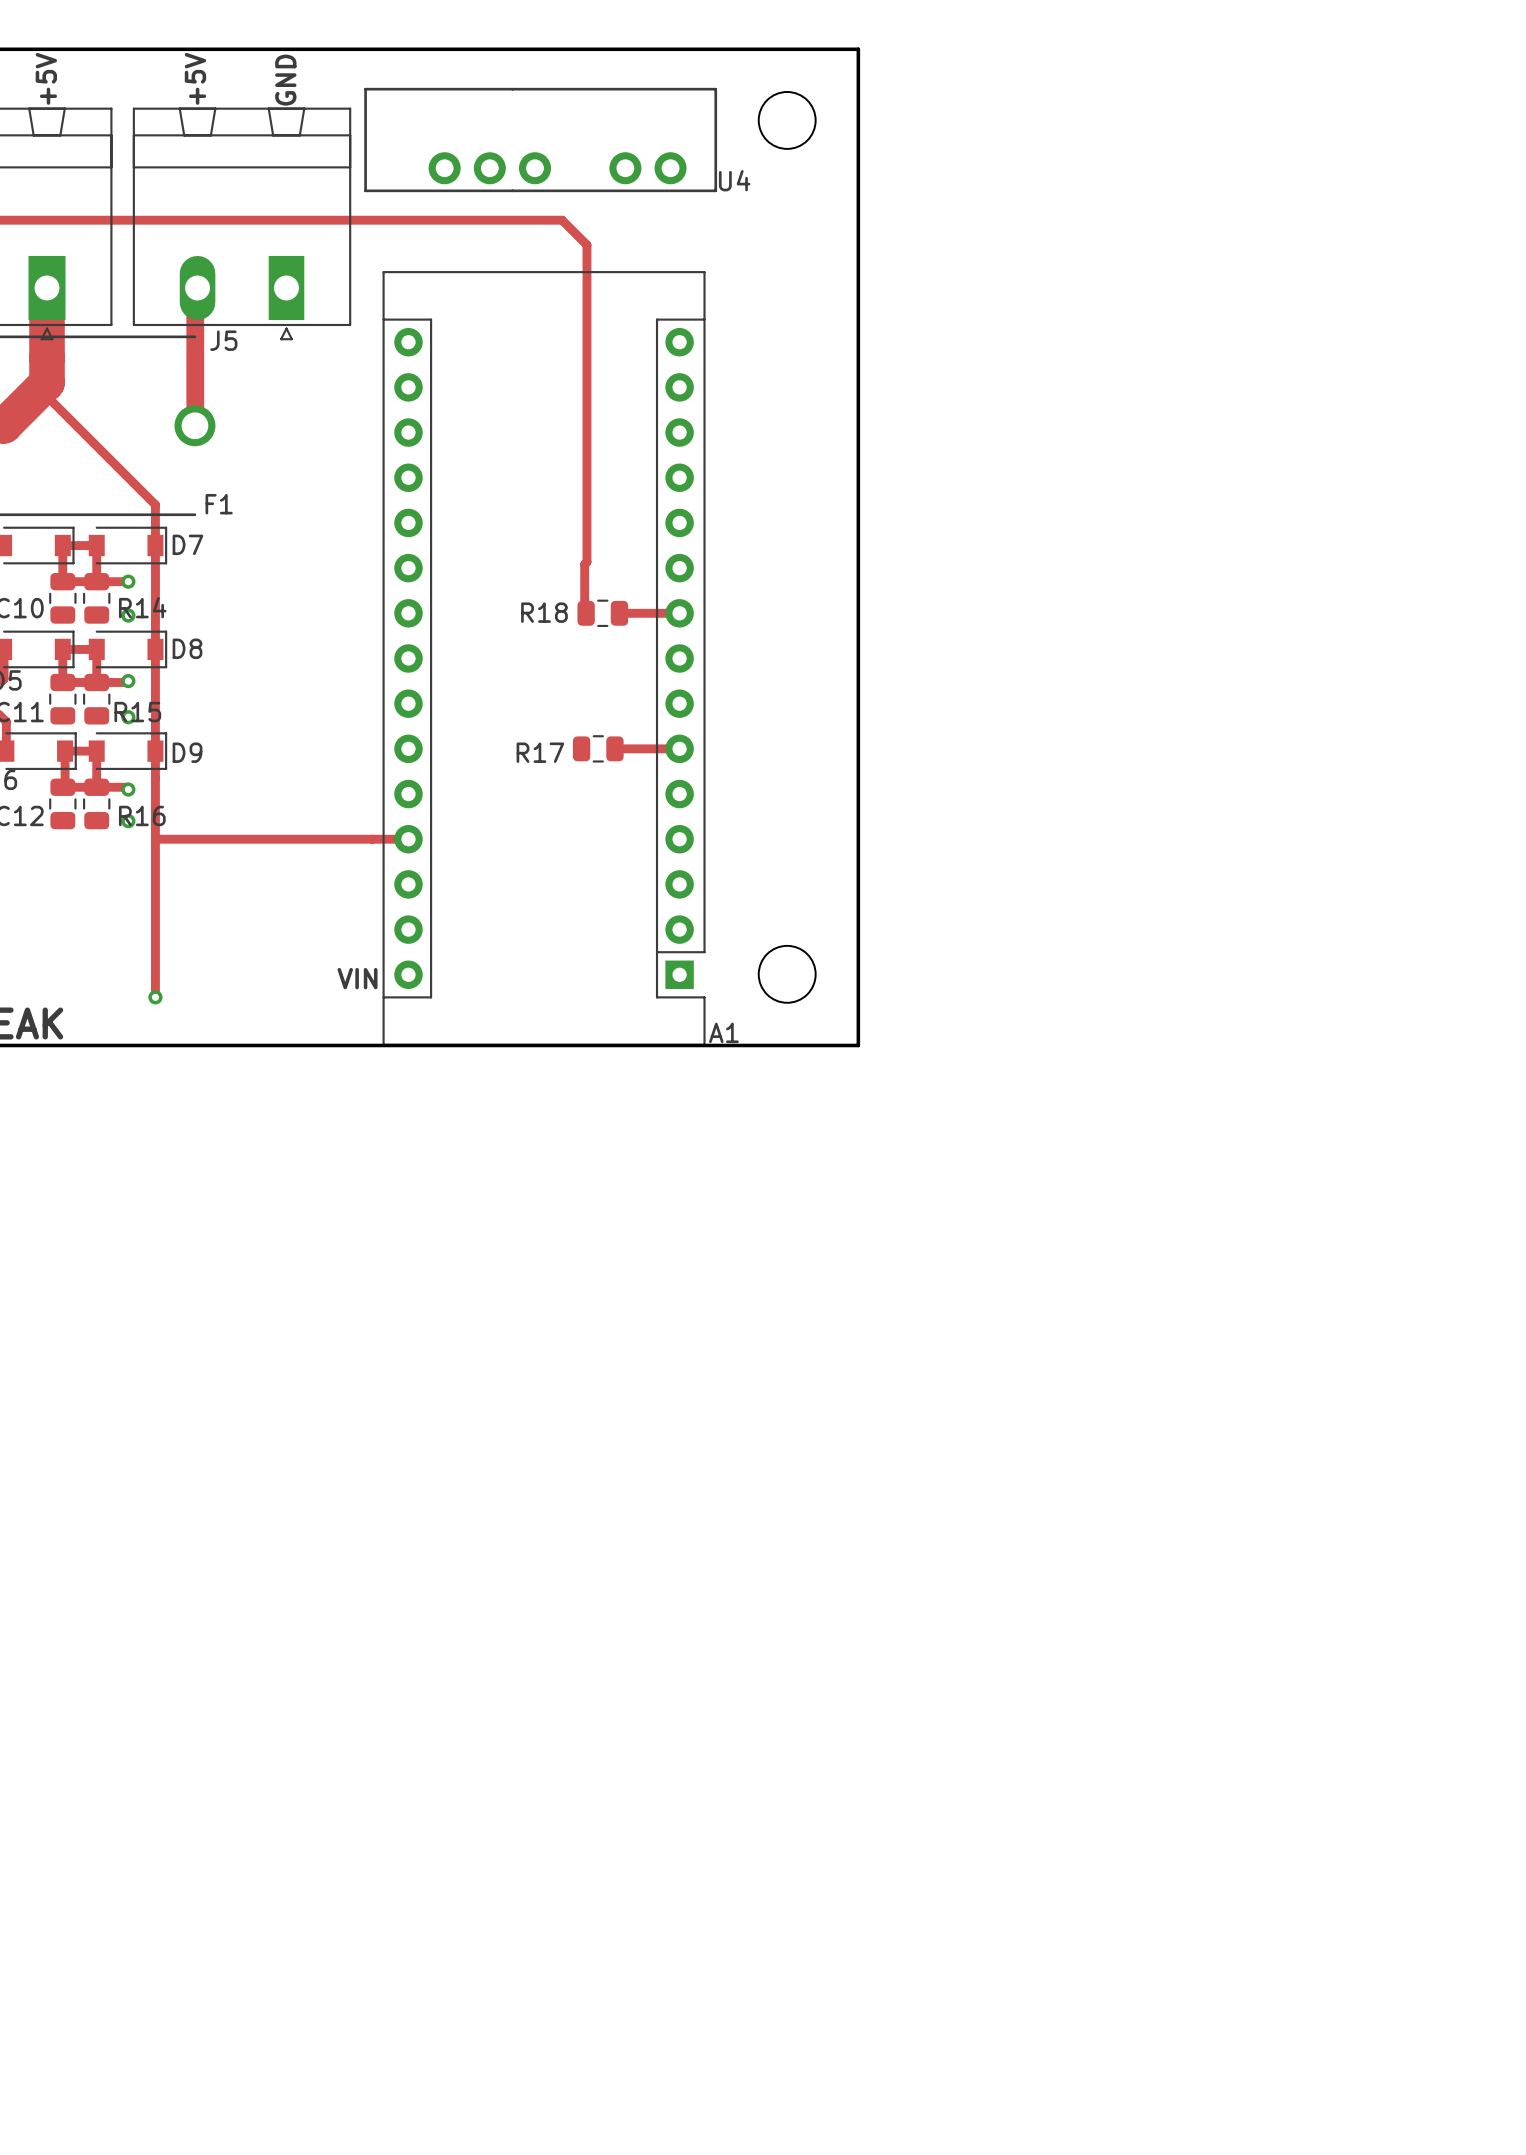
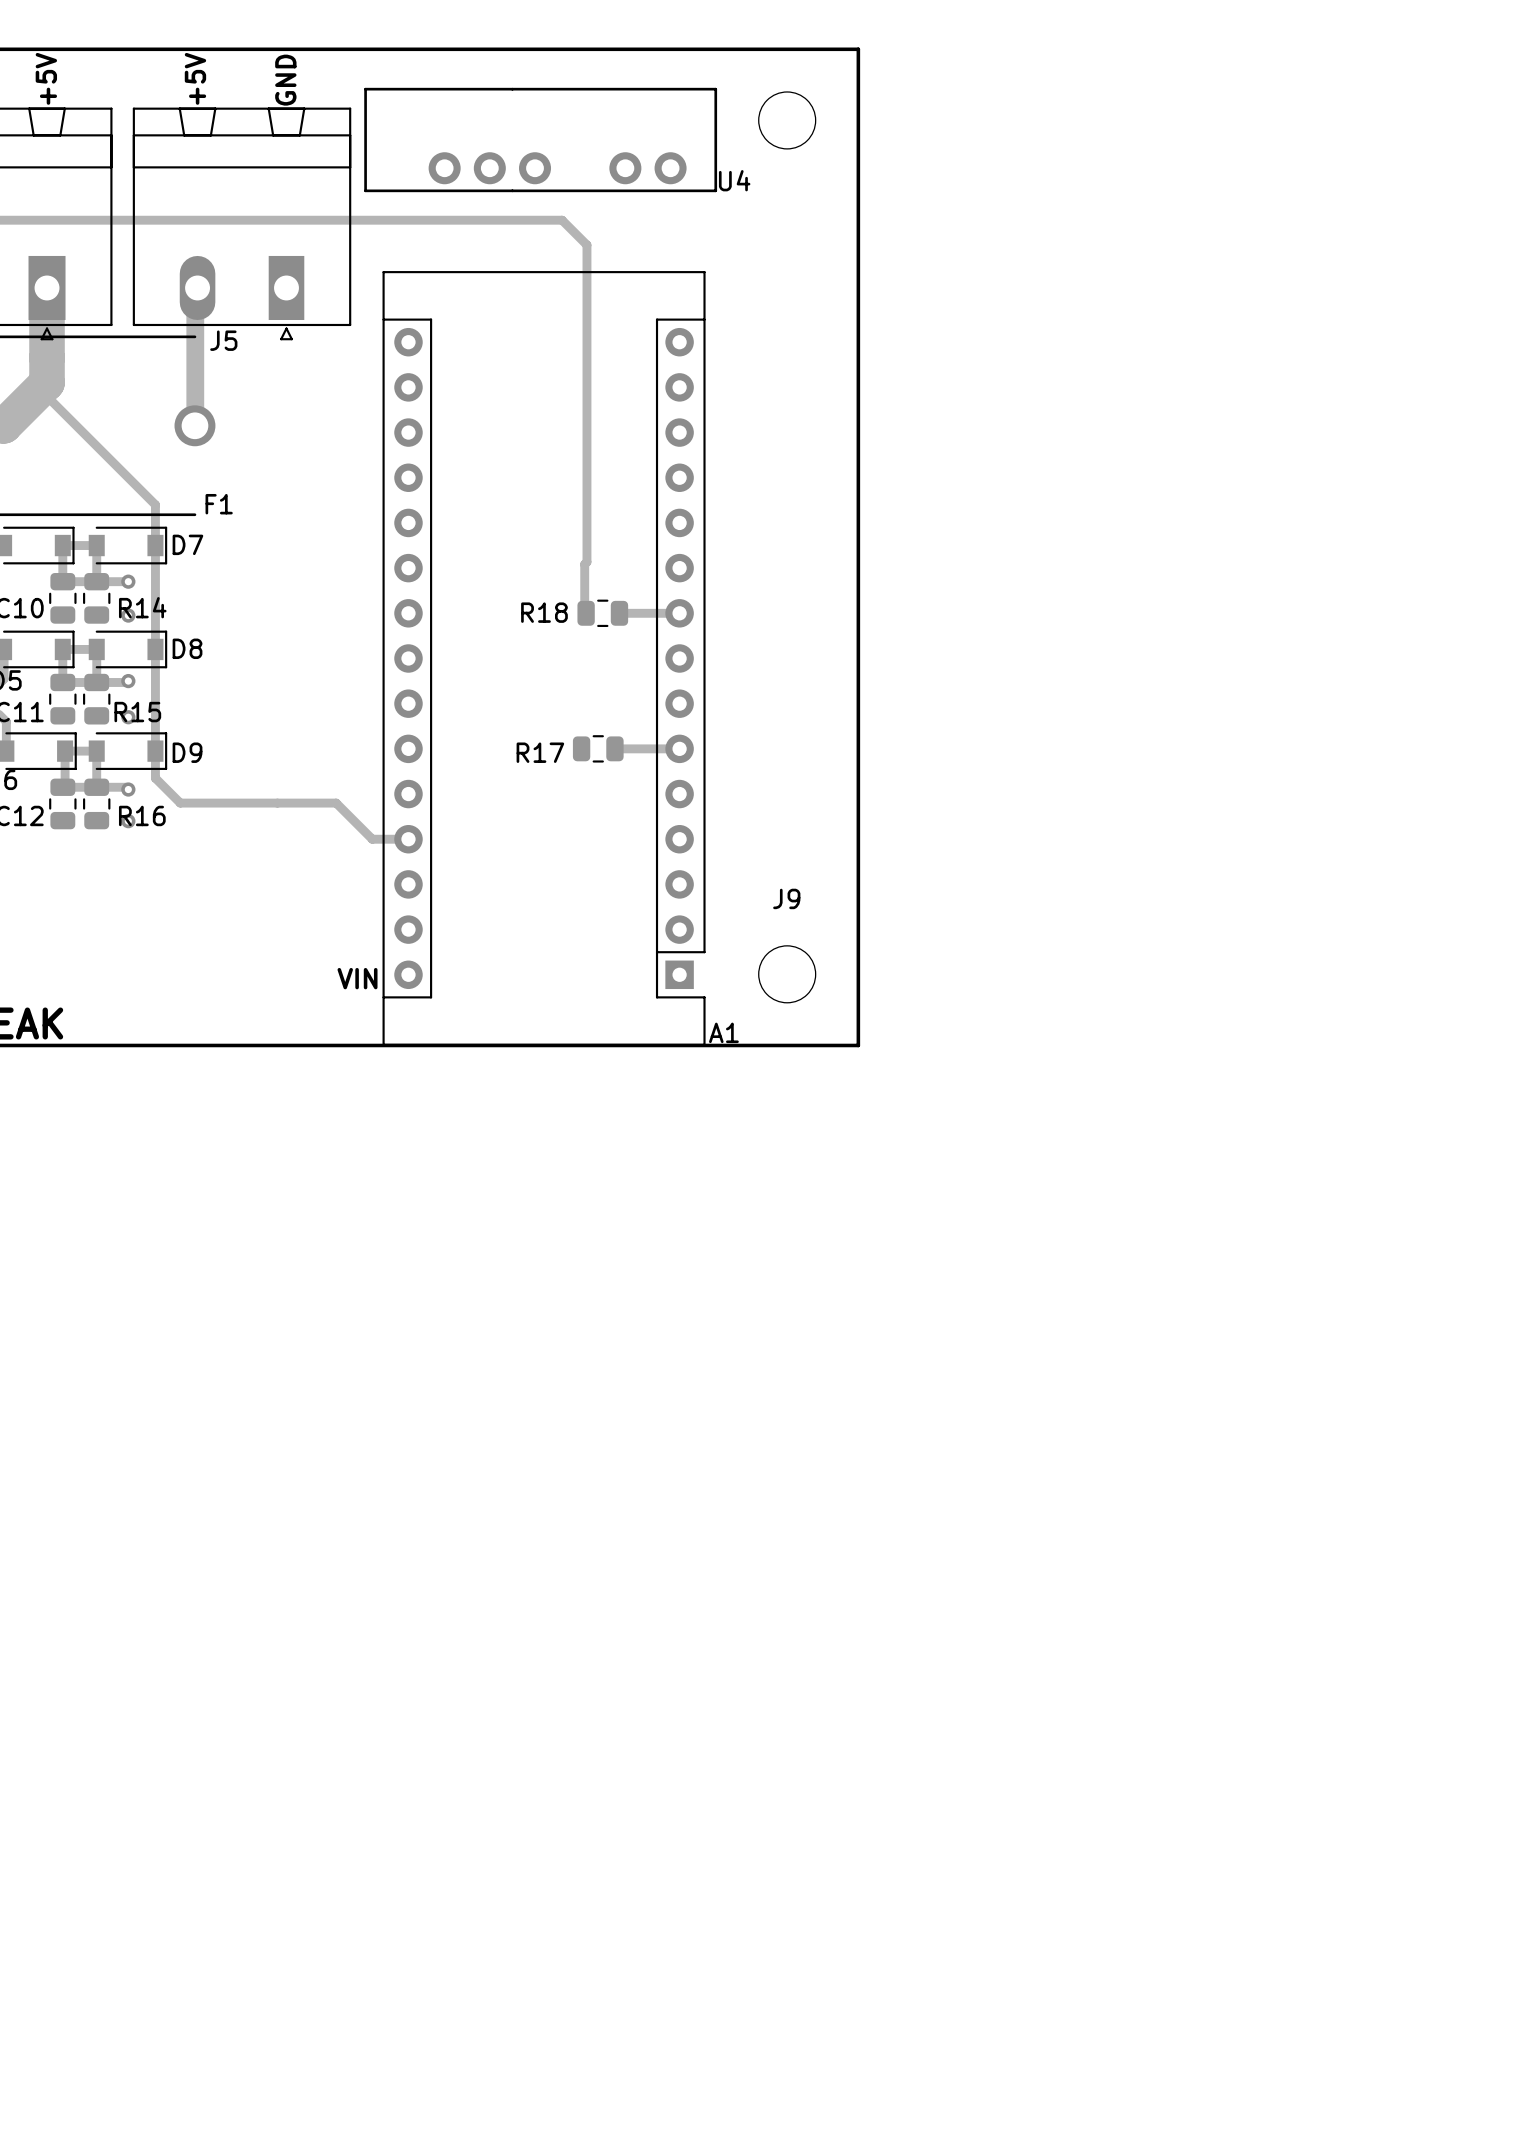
track: (155, 778) (155, 997) -> none
track: (155, 839) (372, 839) -> (155, 778) (180, 803) (336, 803) (372, 839)
J9 name: none -> J9 (786, 898)
via: (155, 997) -> none

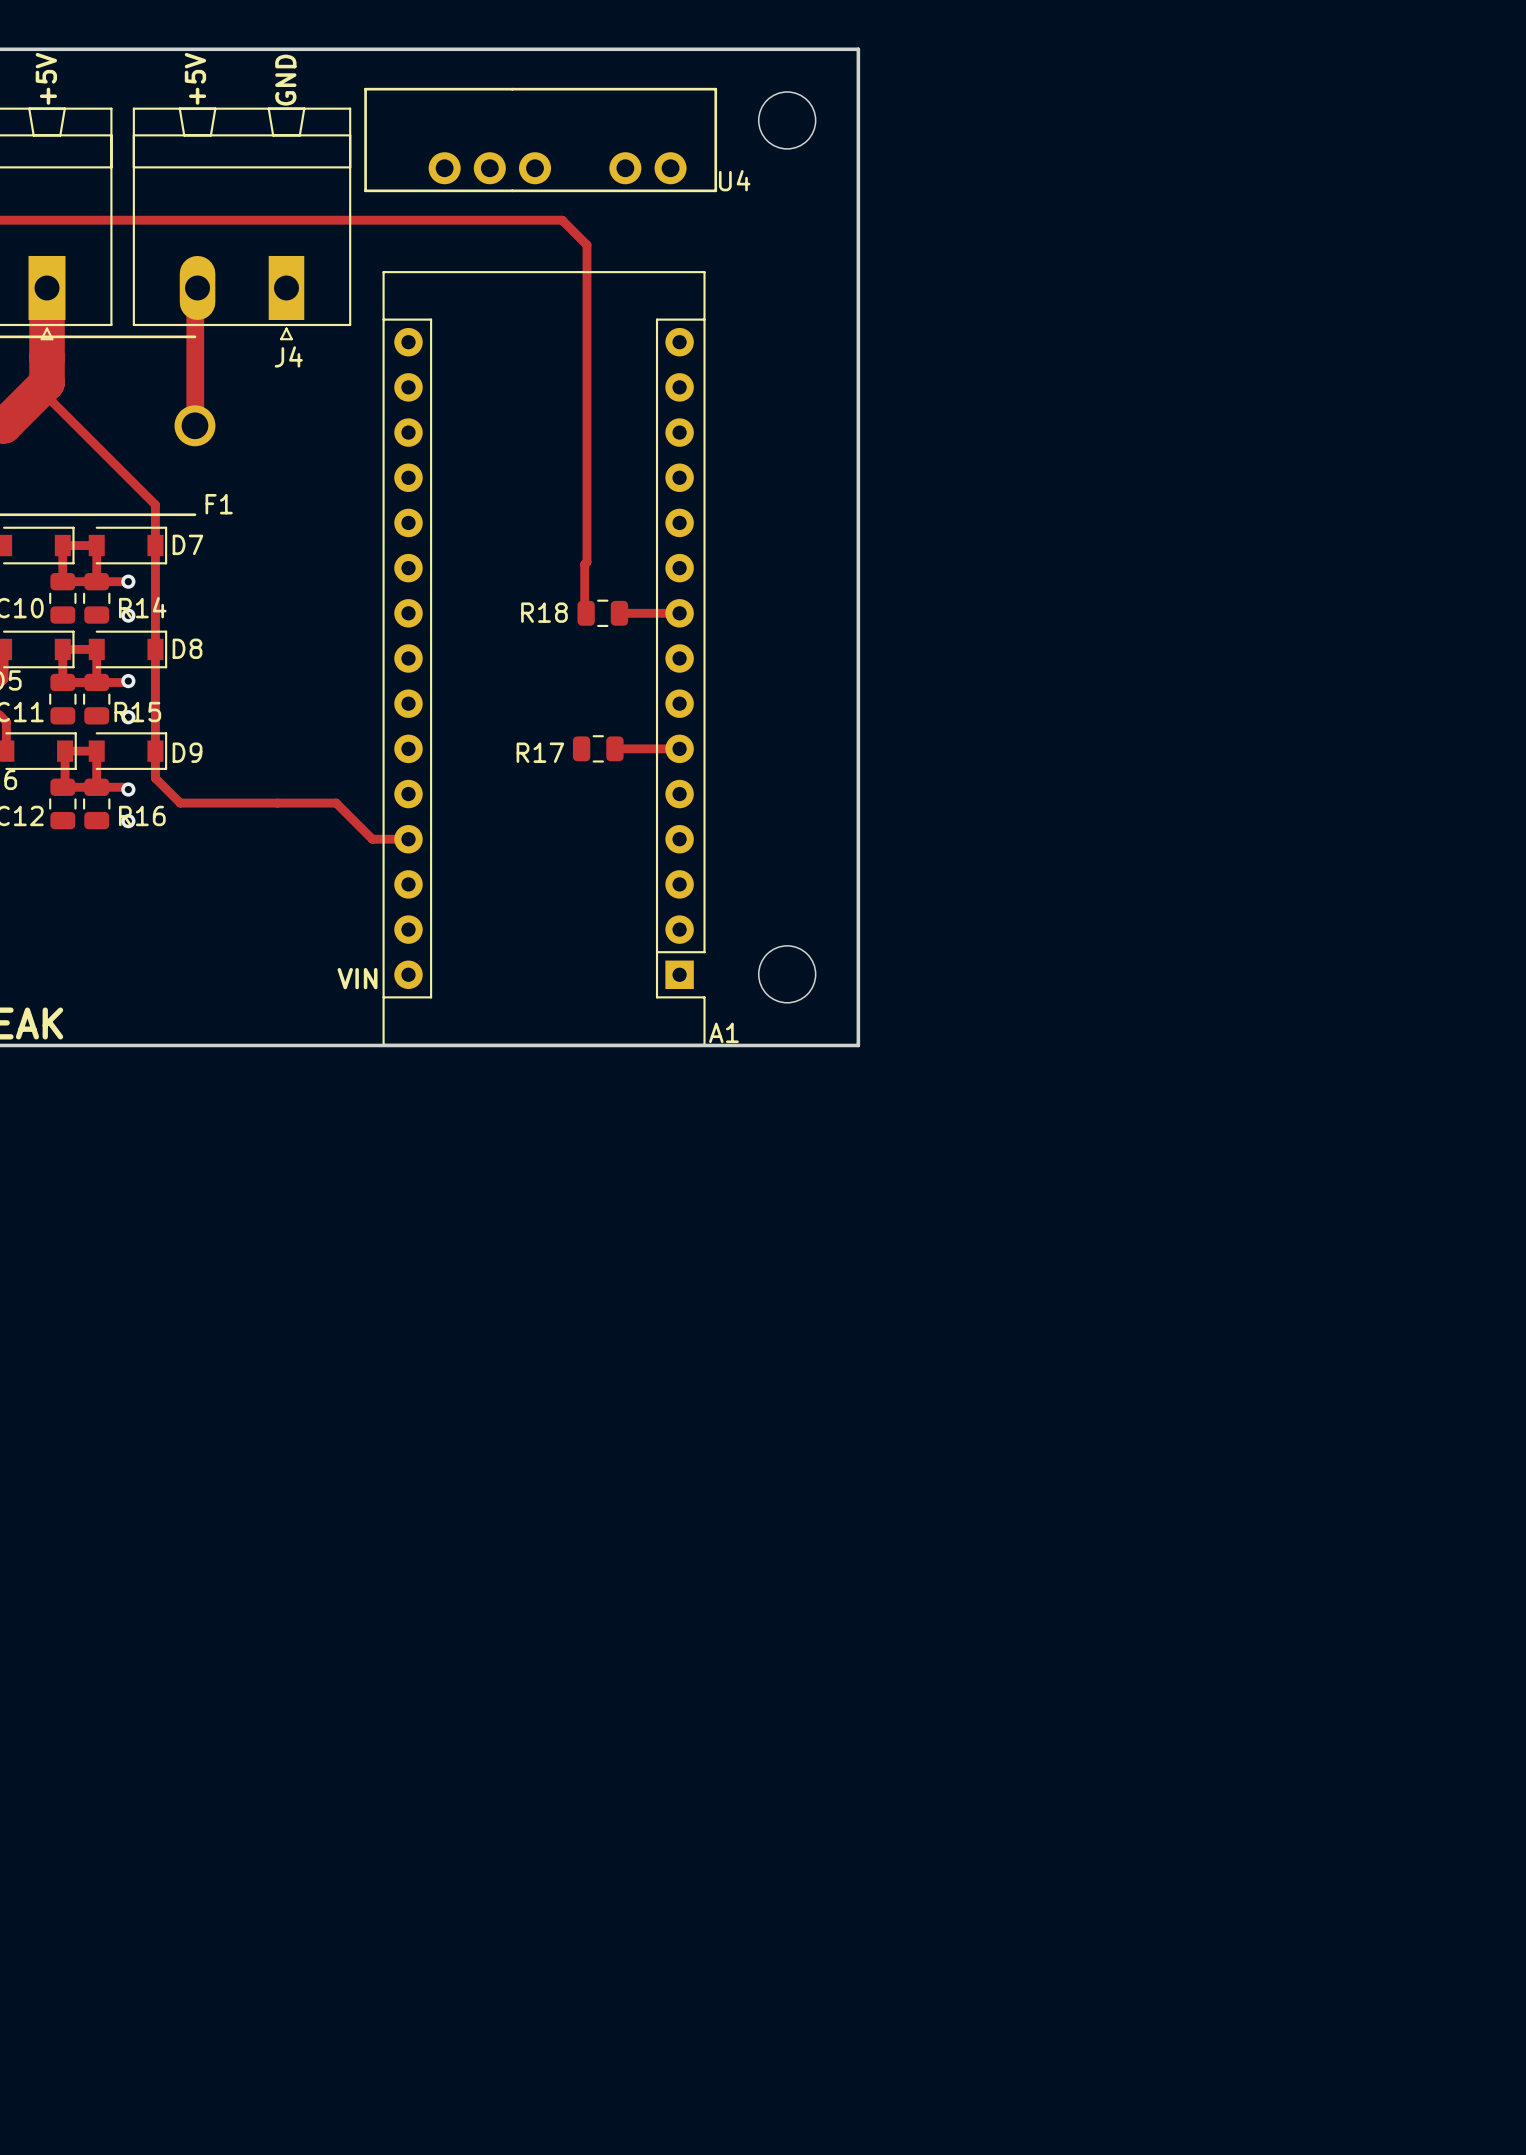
J5 name: J5 (223, 340) -> J4 (288, 356)
J9 name: J9 (786, 898) -> none

